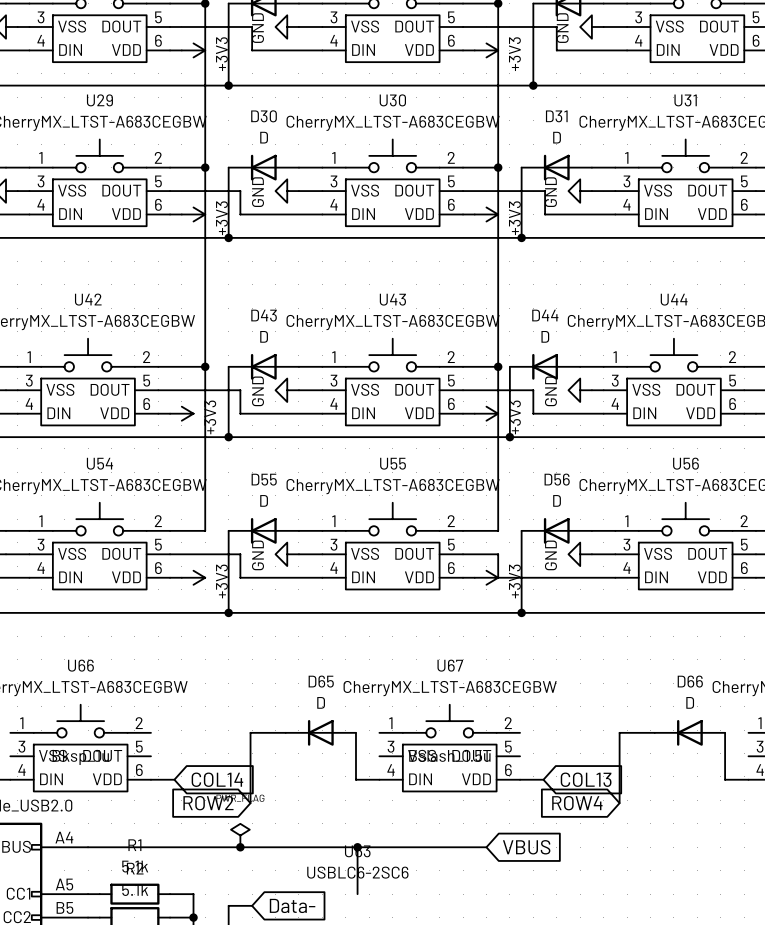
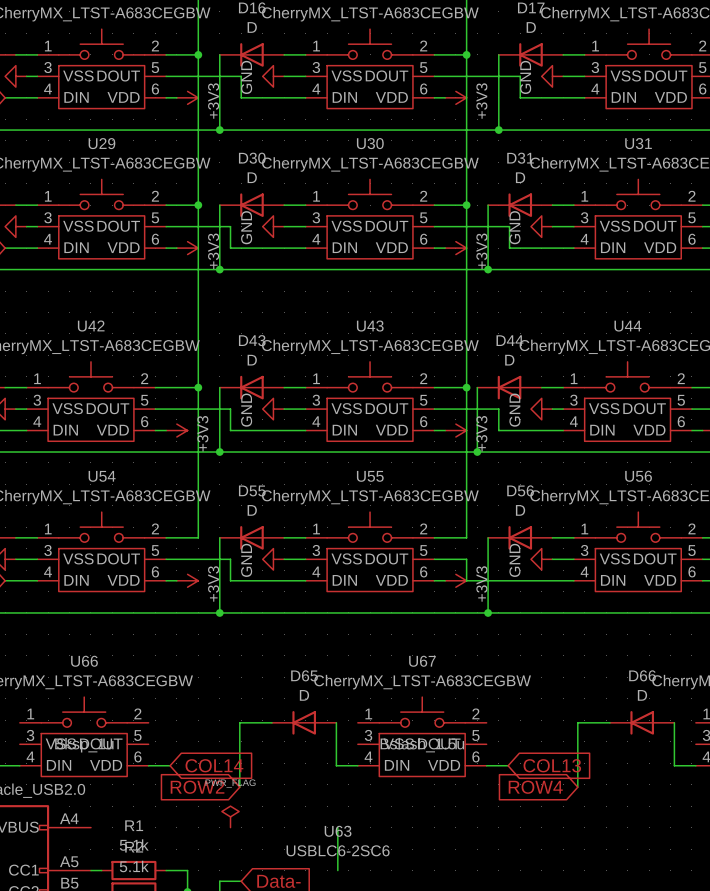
wire: (88, 847) (486, 847) -> none
junction: (240, 847) -> none
junction: (357, 847) -> none
global label: VBUS (526, 847) -> none

